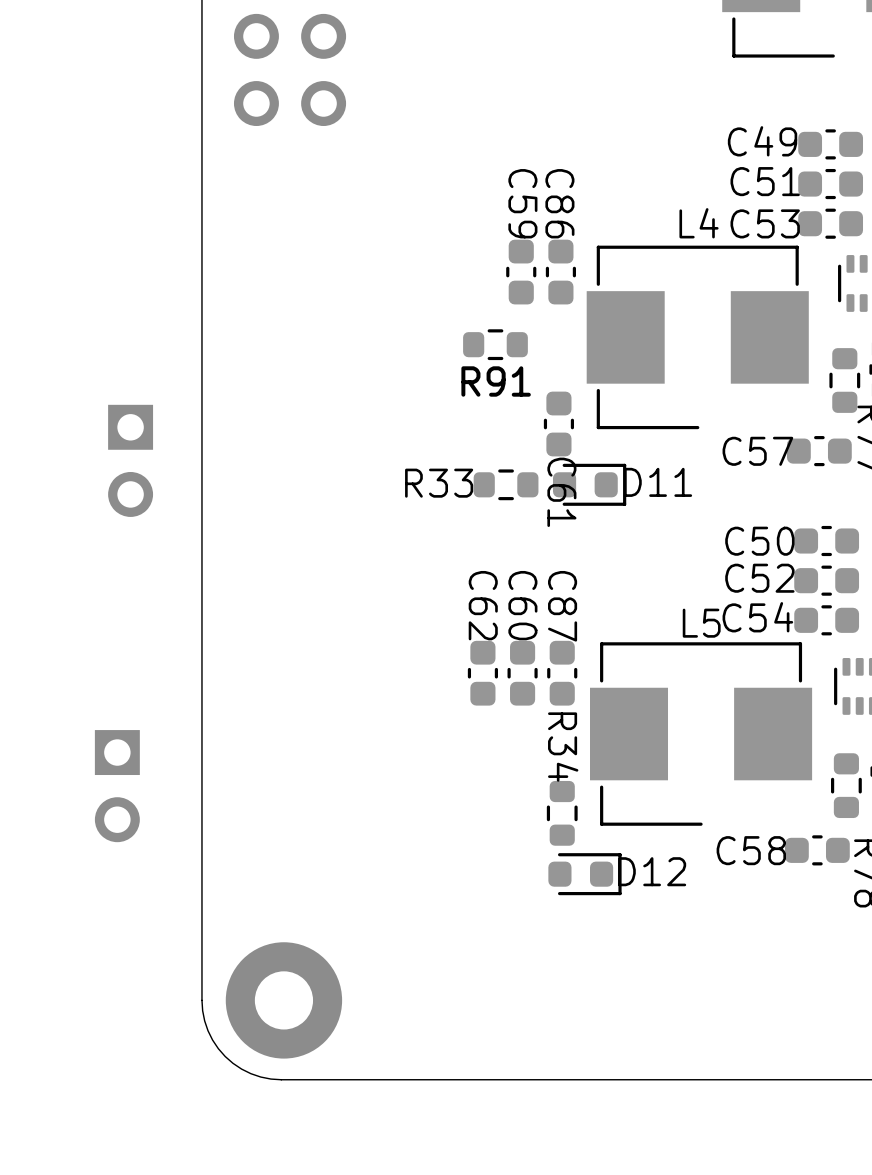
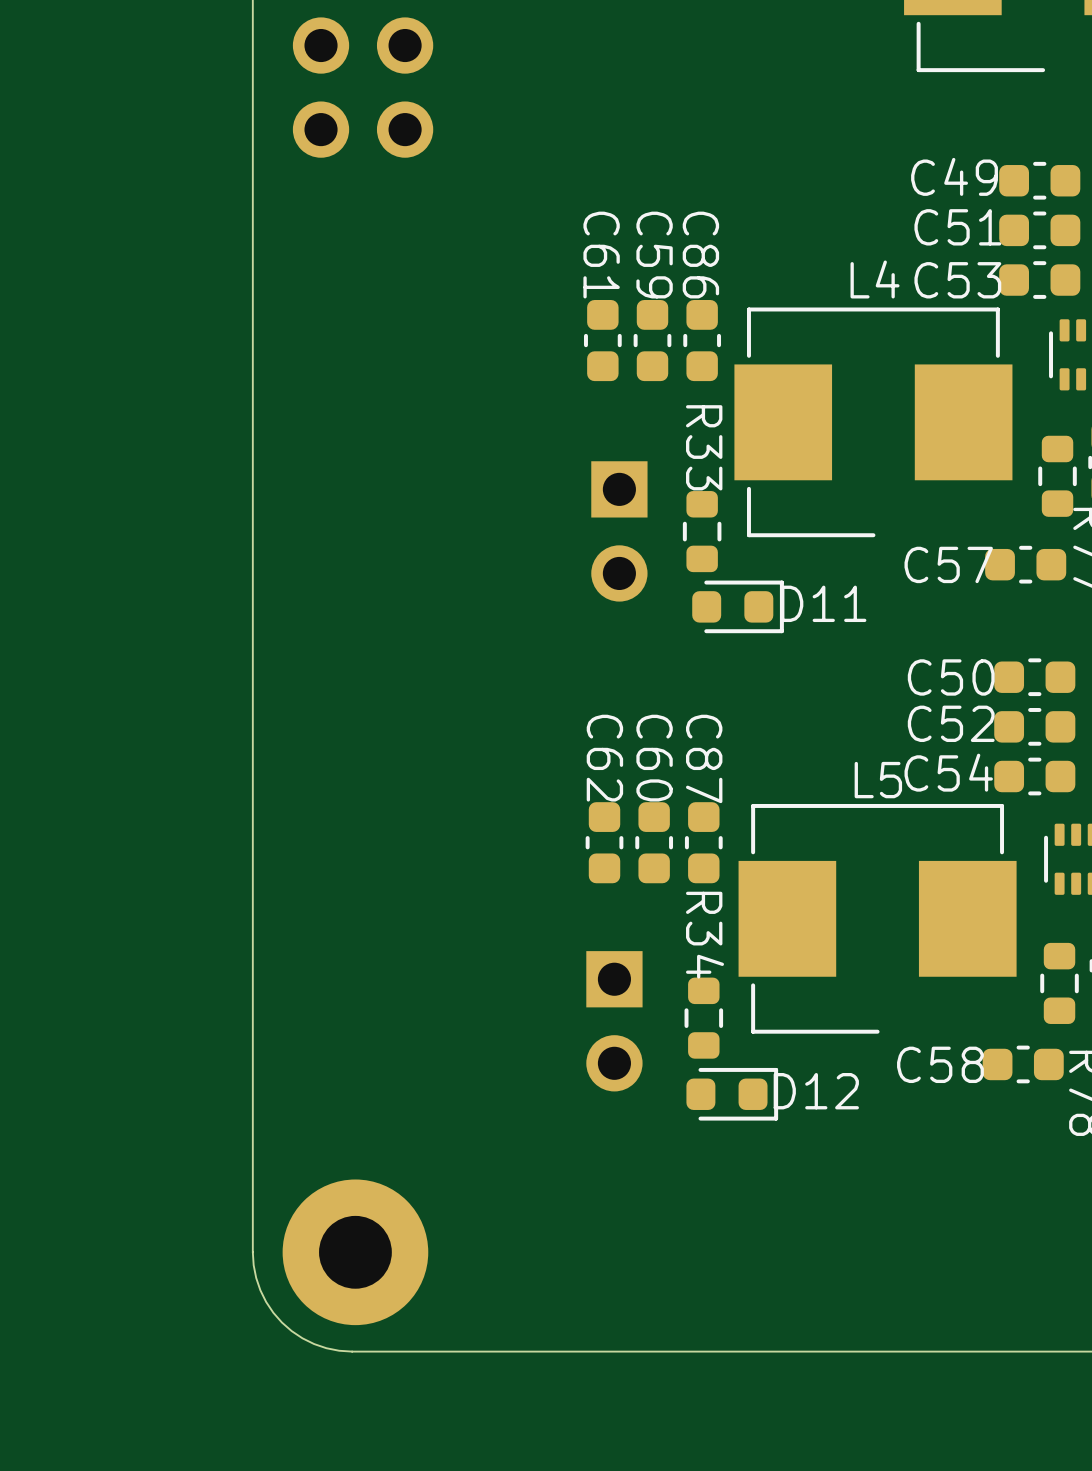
R91: (495, 344) -> none
part: none -> (619, 531)
C61 position: (558, 424) -> (602, 340)
part: (130, 460) -> none
R33 rotation: 0° (506, 484) -> 90° clockwise (702, 531)
R33 position: (506, 484) -> (702, 531)
C61 name position: C61 (561, 492) -> C61 (601, 255)
part: (117, 786) -> none
part: none -> (614, 1021)

